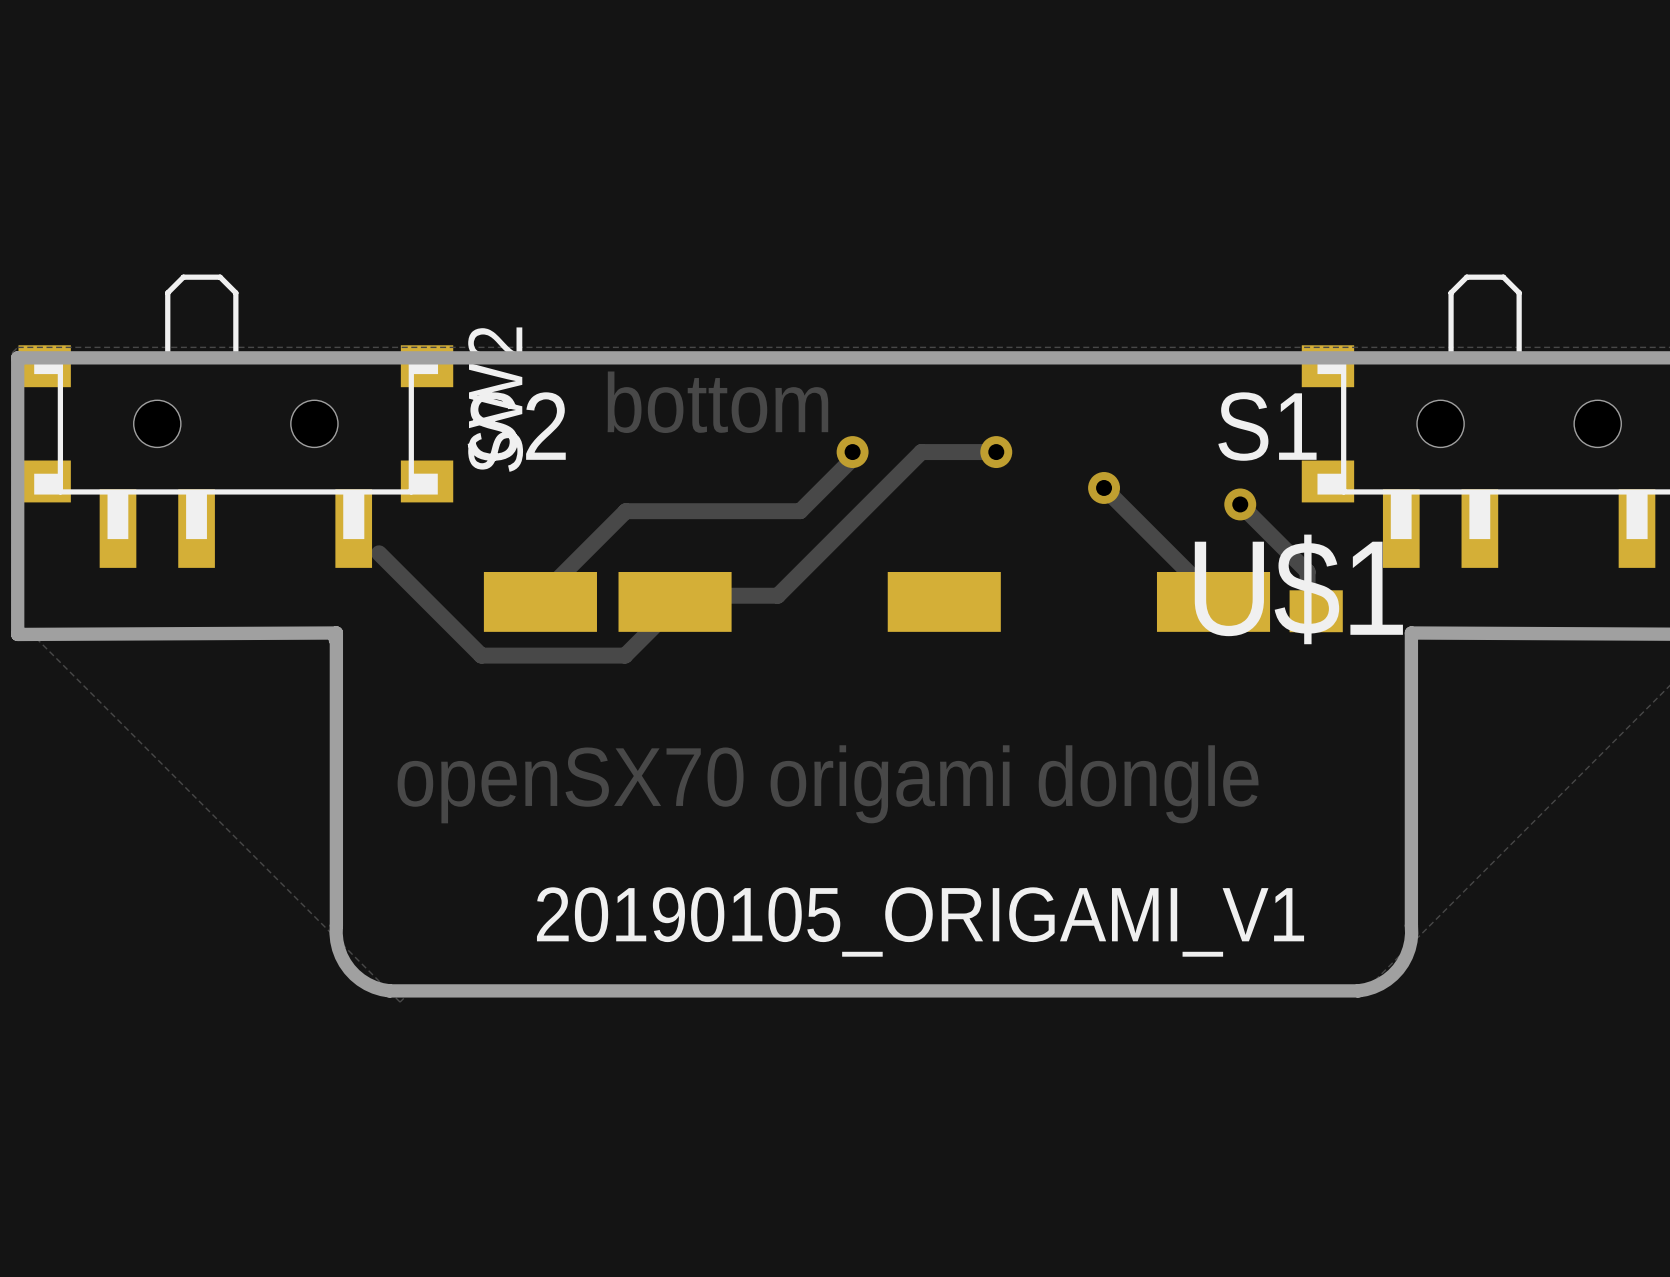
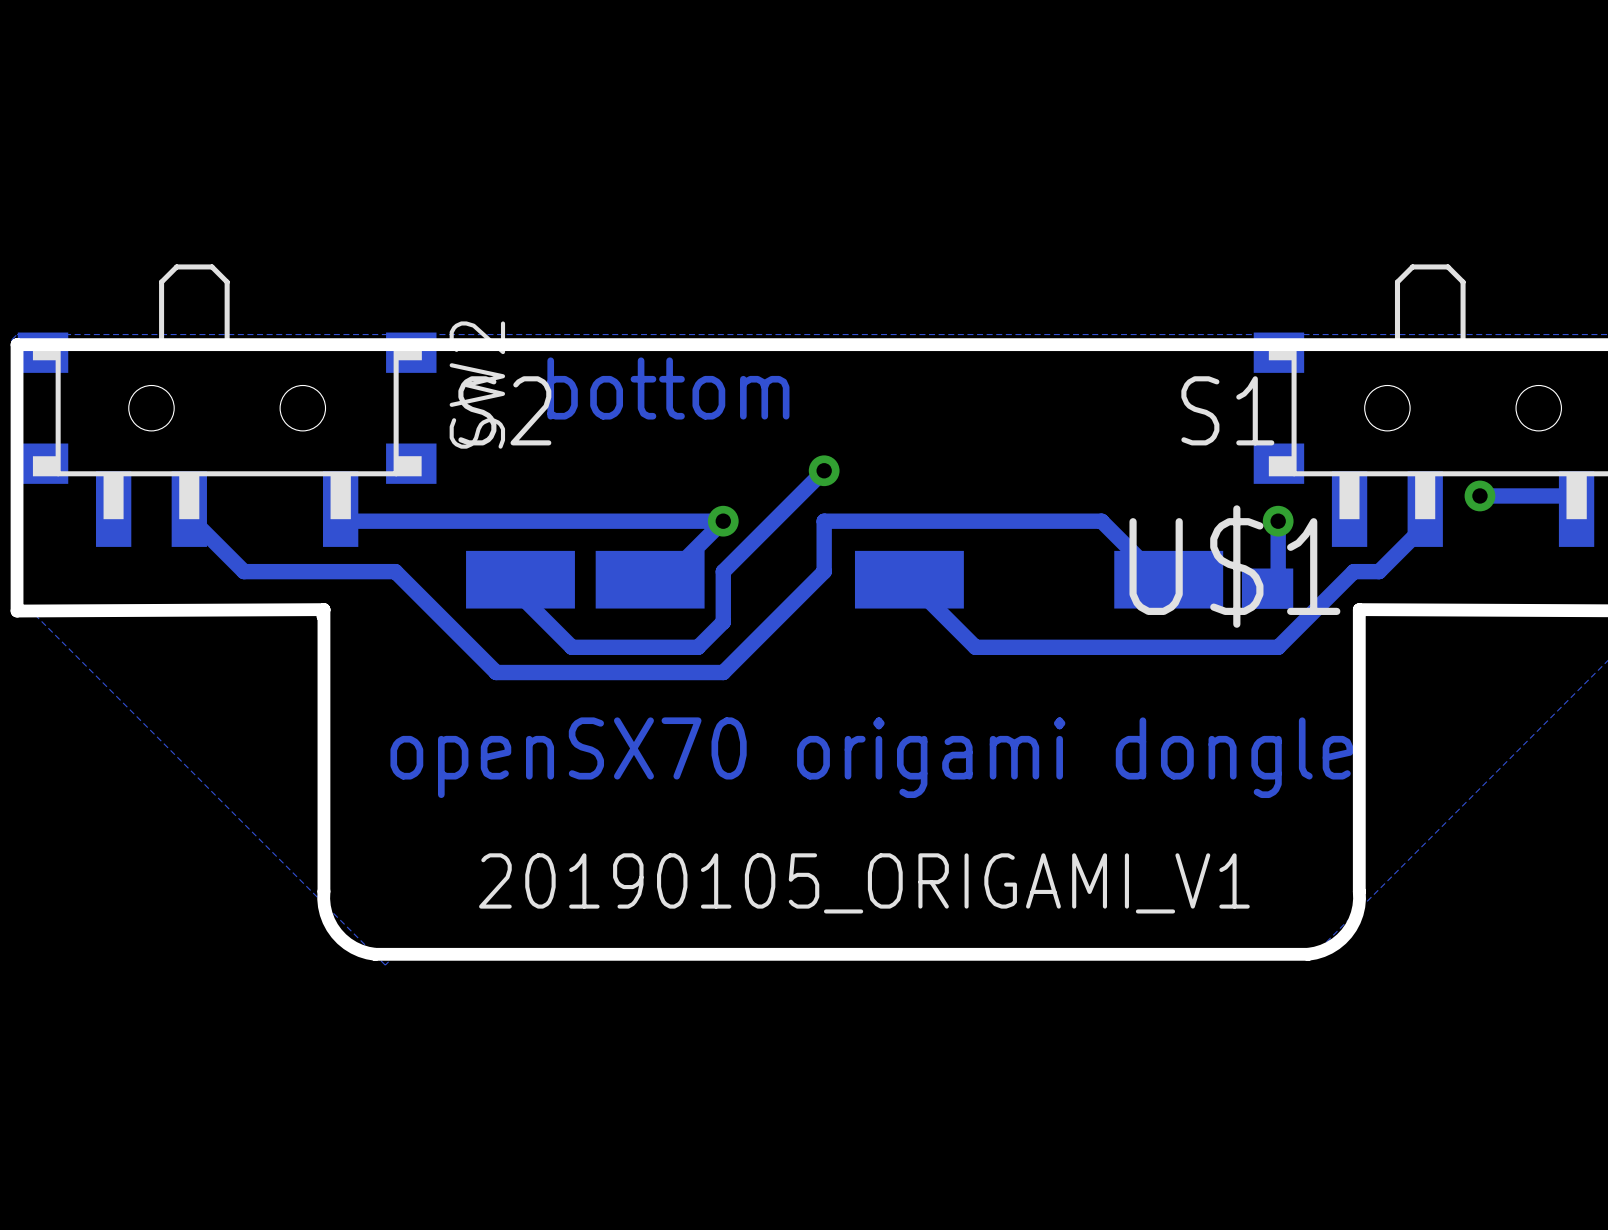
track: (852, 452) (850, 454) (850, 461) (800, 511) (625, 511) (541, 595) (540, 601) -> (824, 470) (723, 571) (723, 622) (698, 647) (571, 647) (521, 596) (520, 579)
via position: (852, 452) -> (824, 470)
track: (996, 452) (921, 452) (777, 595) (684, 595) (675, 601) (672, 607) (625, 655) (481, 655) (379, 553) -> none
via: (996, 452) -> none
track: (1104, 487) (1211, 595) (1213, 601) -> (189, 509) (193, 521) (244, 571) (395, 571) (496, 672) (723, 672) (824, 571) (824, 521) (1101, 521) (1152, 571) (1168, 579)
via: (1104, 487) -> none
track: (1240, 504) (1307, 571) (1307, 607) (1316, 611) -> (1278, 521) (1278, 571) (1267, 588)
via position: (1240, 504) -> (1278, 521)
track: none -> (1479, 495) (1580, 495) (1576, 509)
via: none -> (1479, 495)
track: none -> (340, 509) (344, 521) (723, 521) (672, 571) (650, 579)
track: none -> (1425, 509) (1429, 521) (1379, 571) (1353, 571) (1278, 647) (975, 647) (909, 579)
via: none -> (723, 521)

